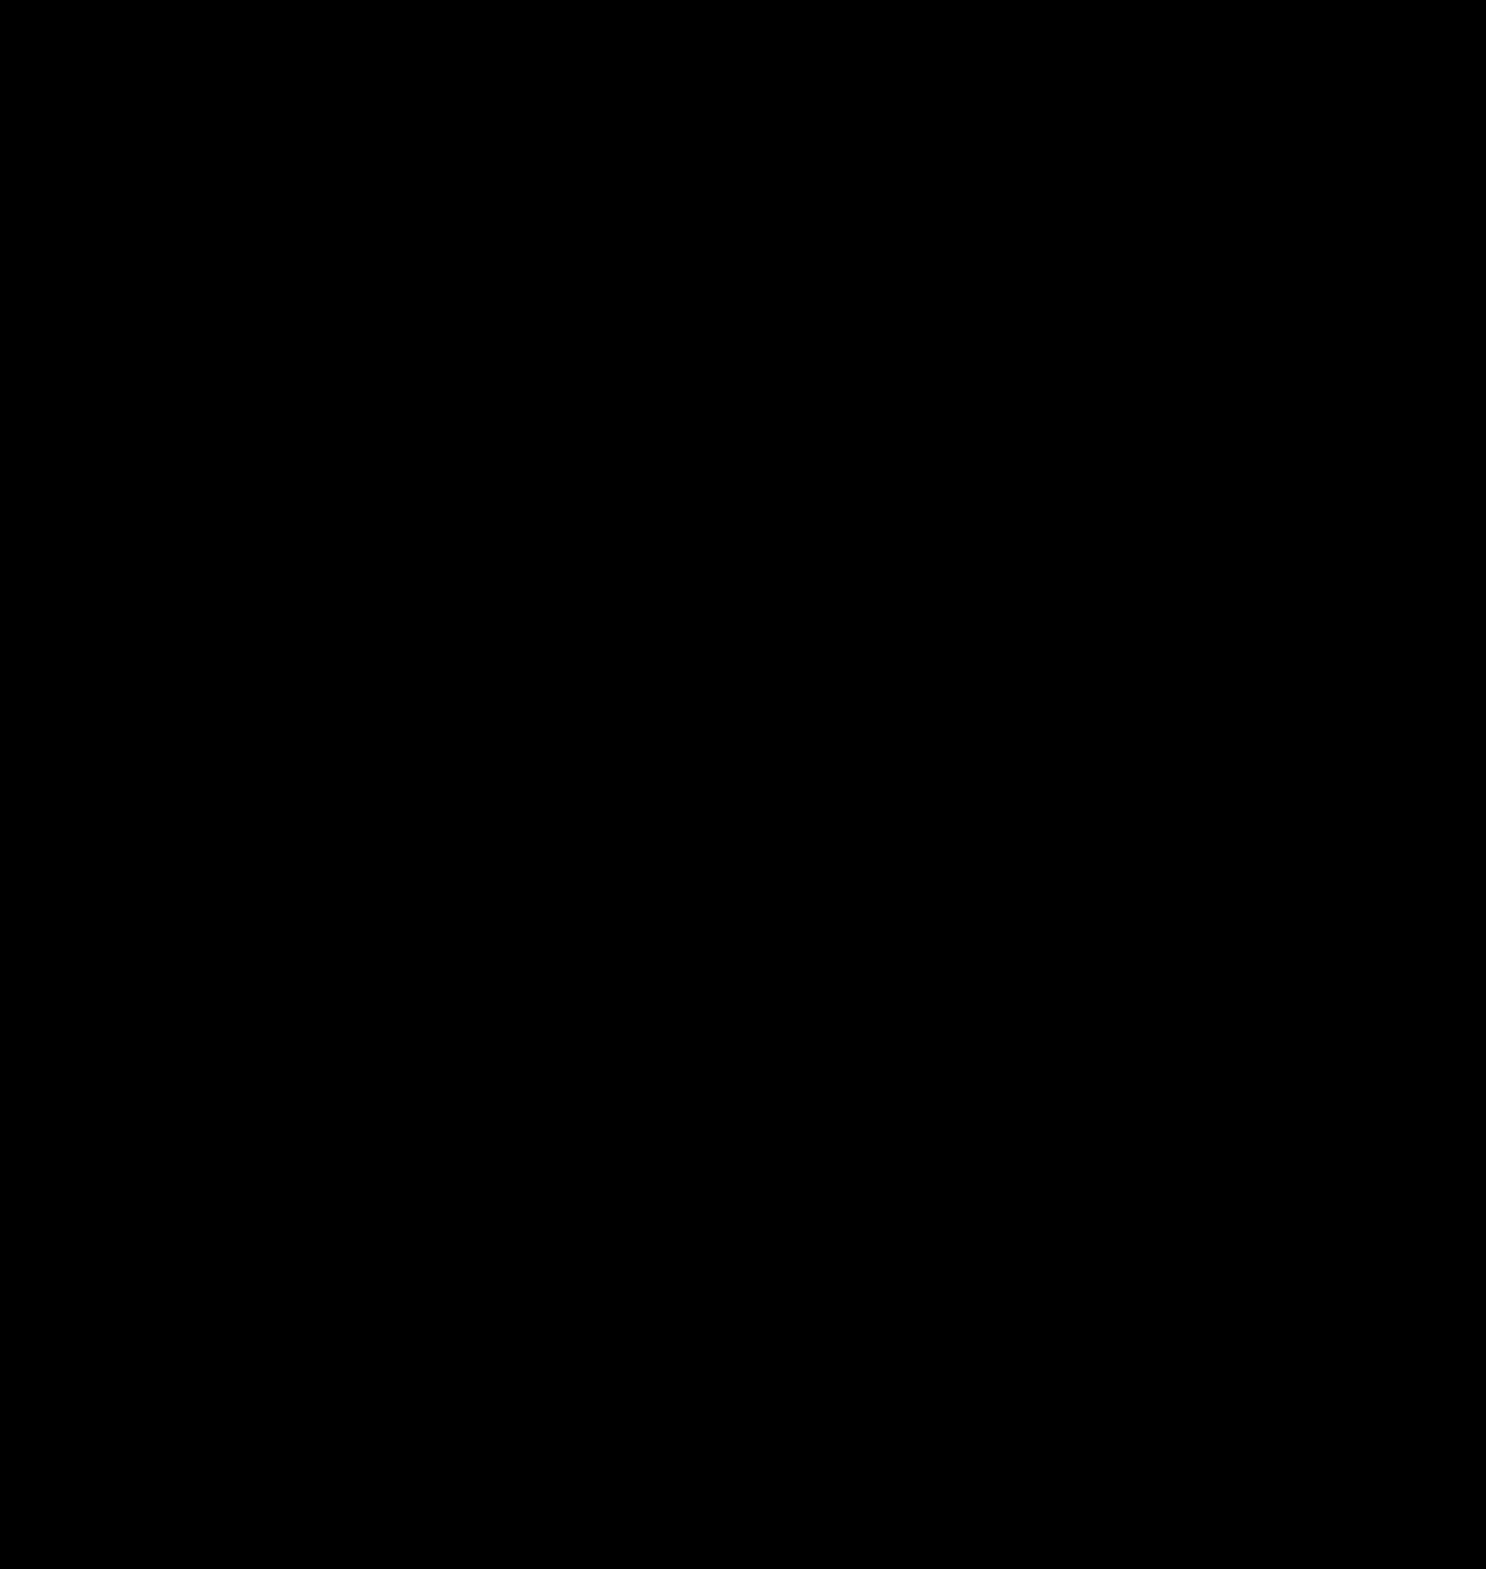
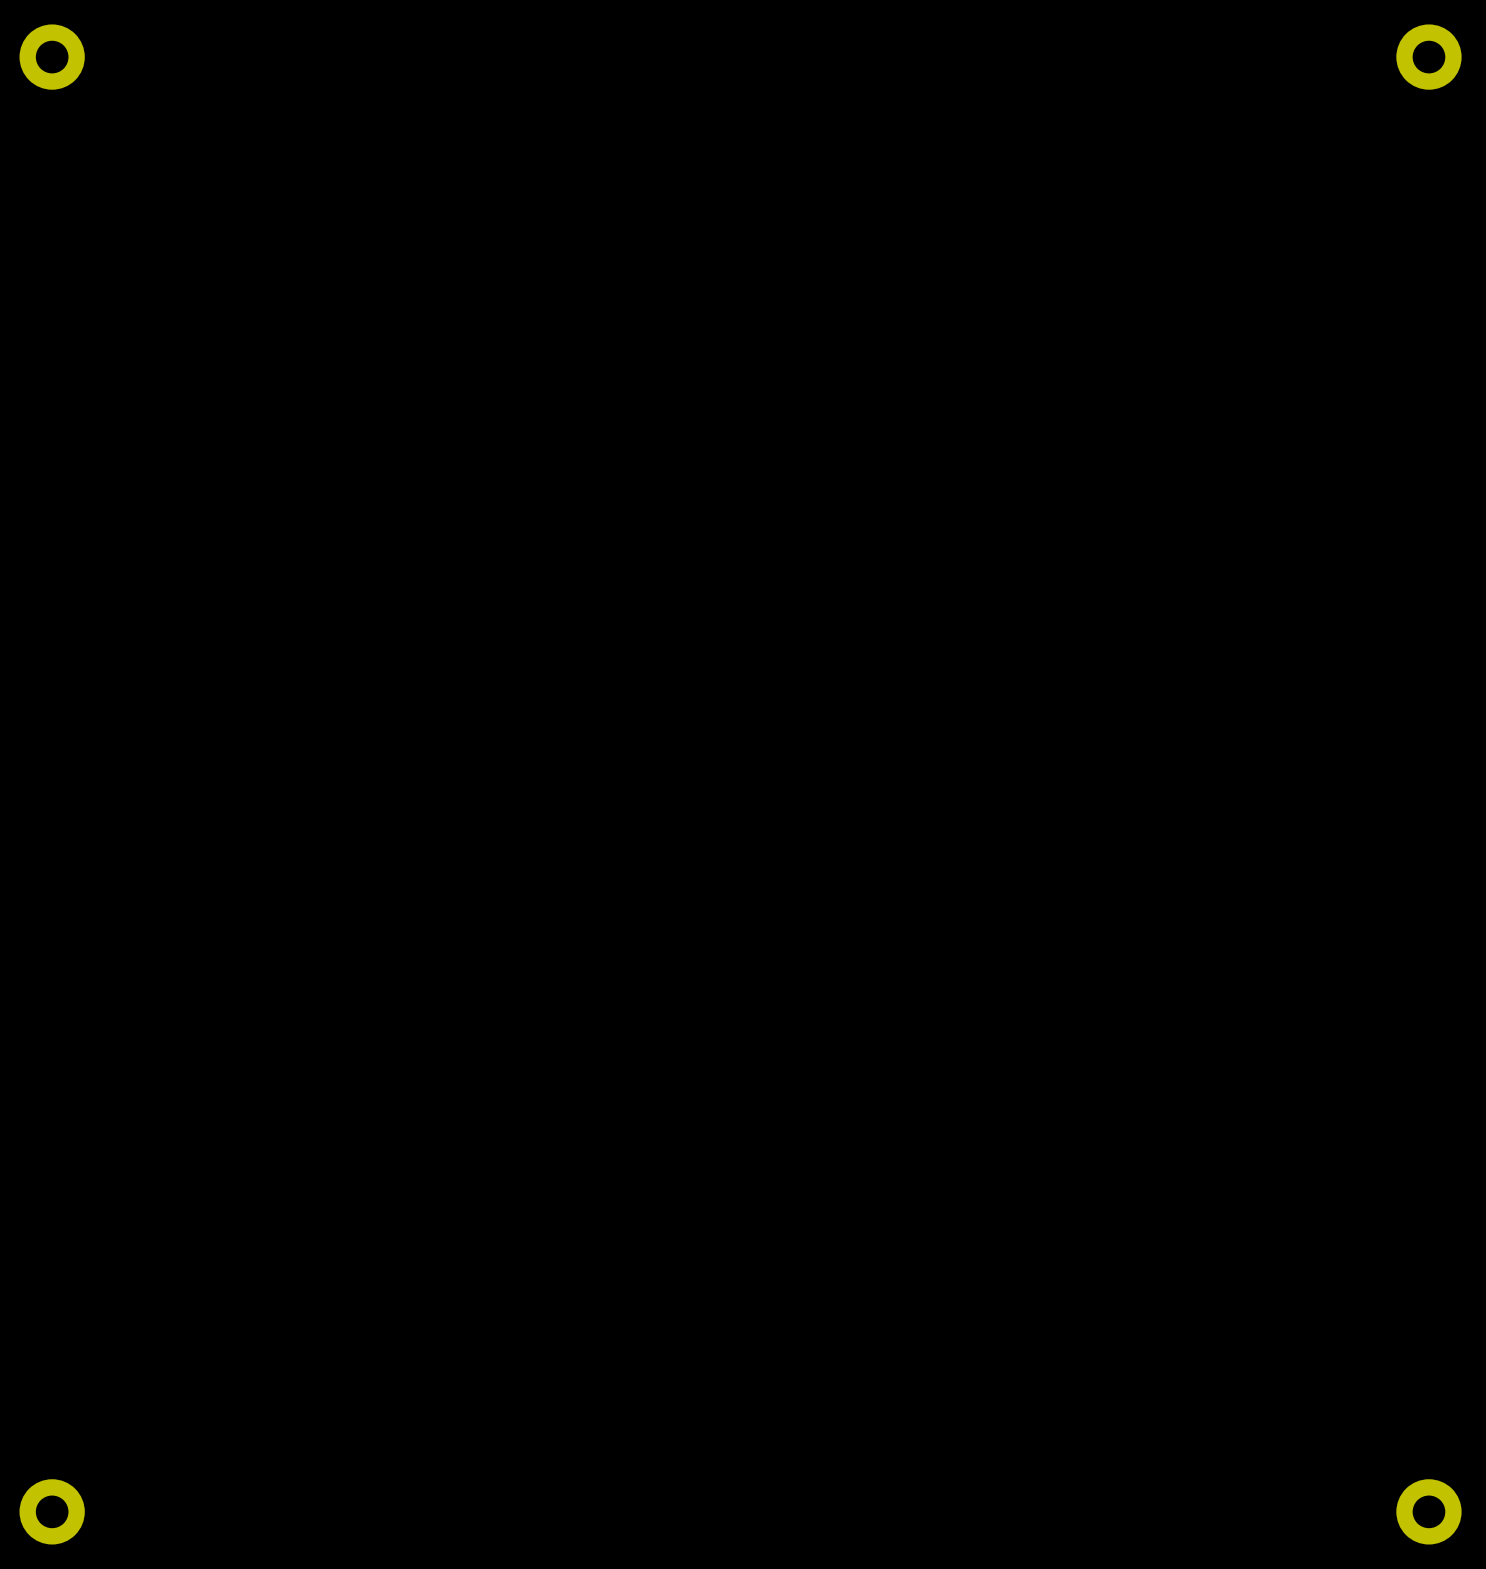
part: none -> (52, 57)
part: none -> (1428, 57)
part: none -> (52, 1511)
part: none -> (1428, 1511)

